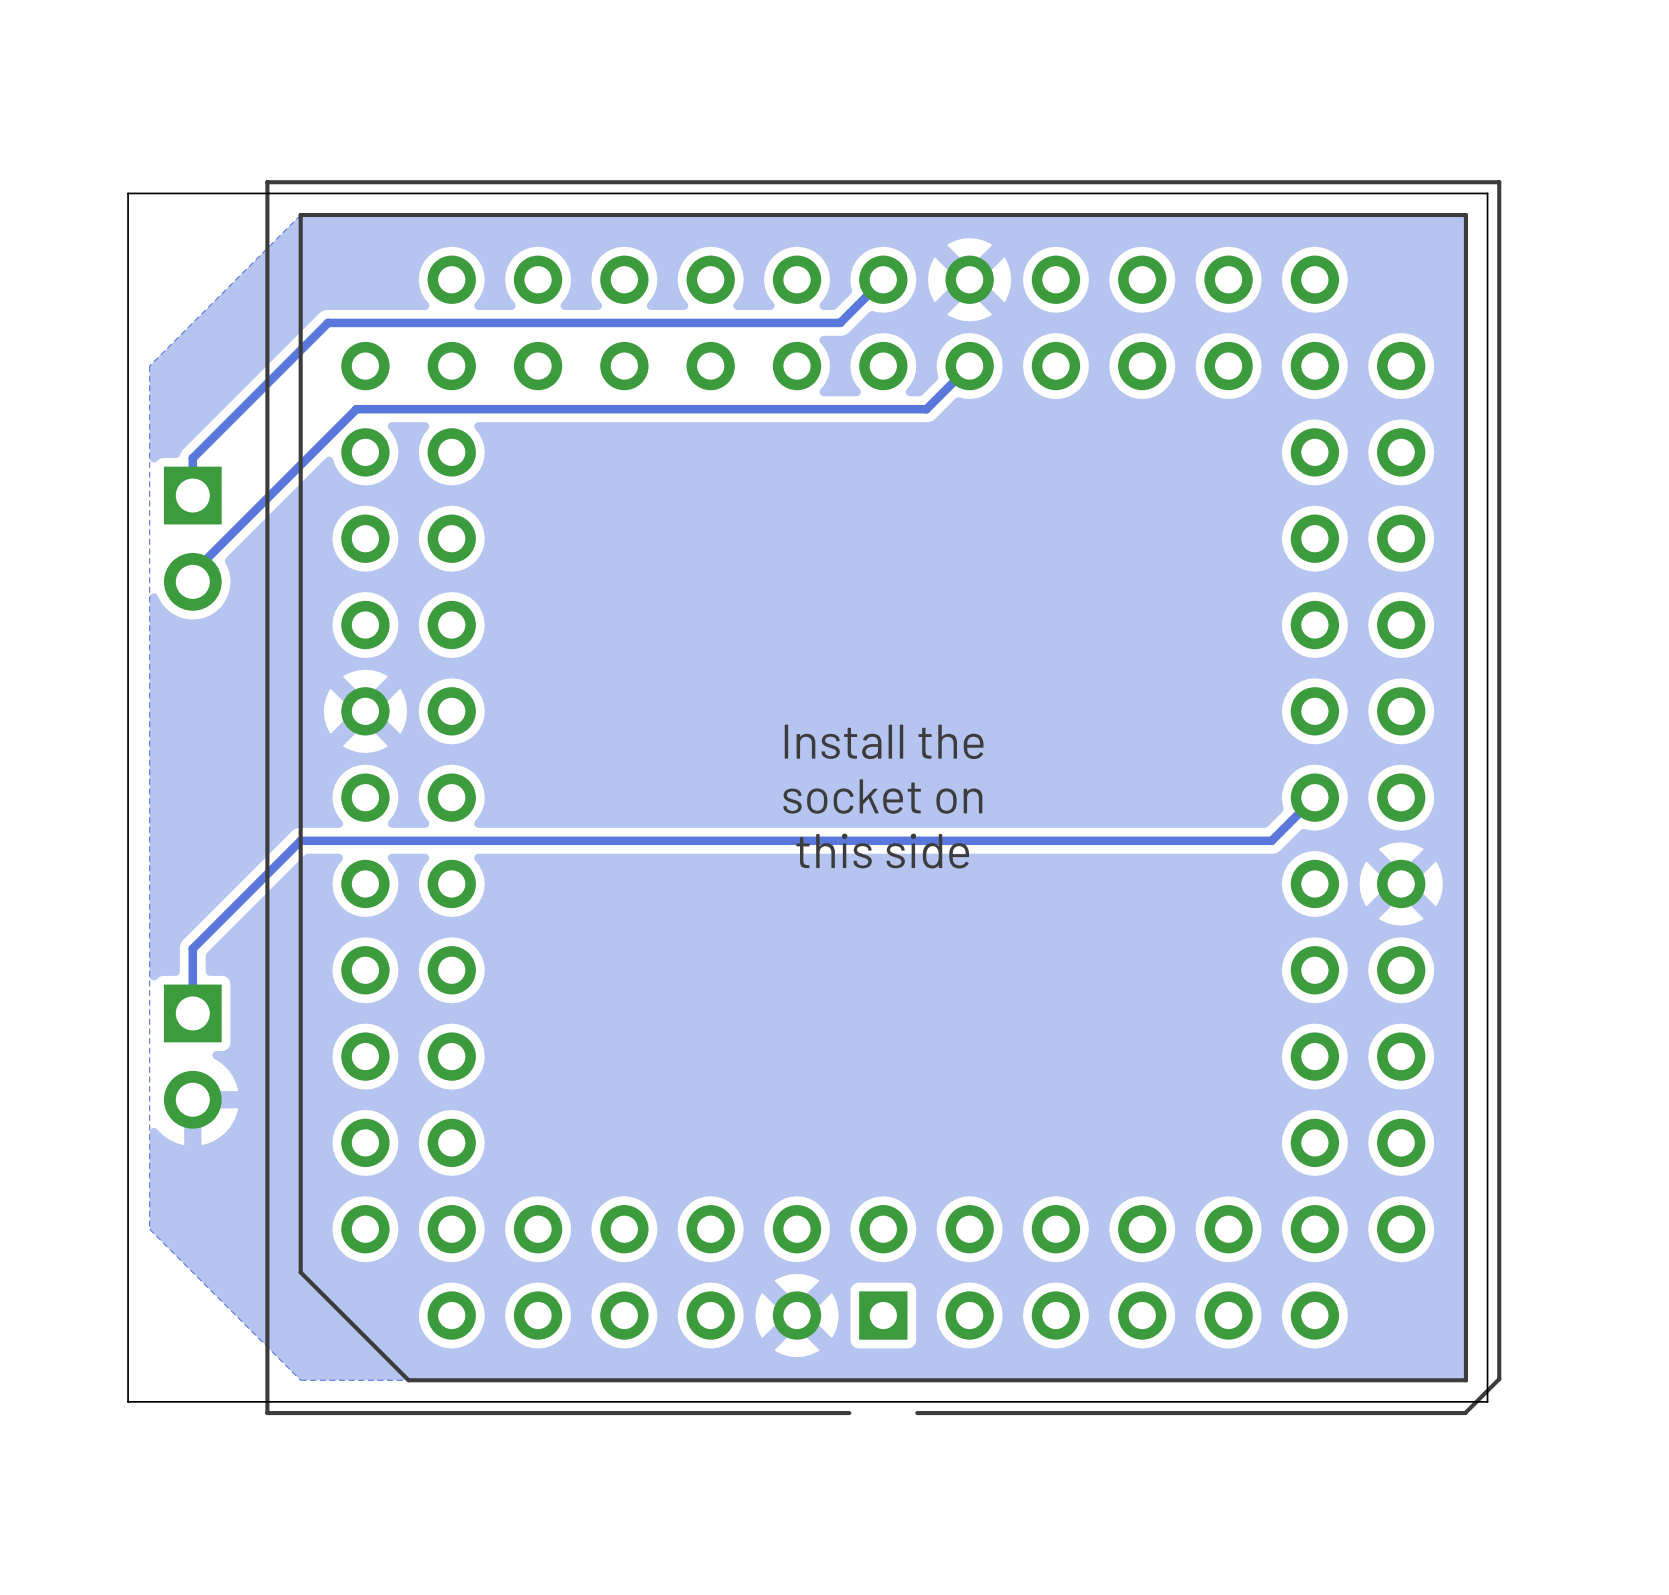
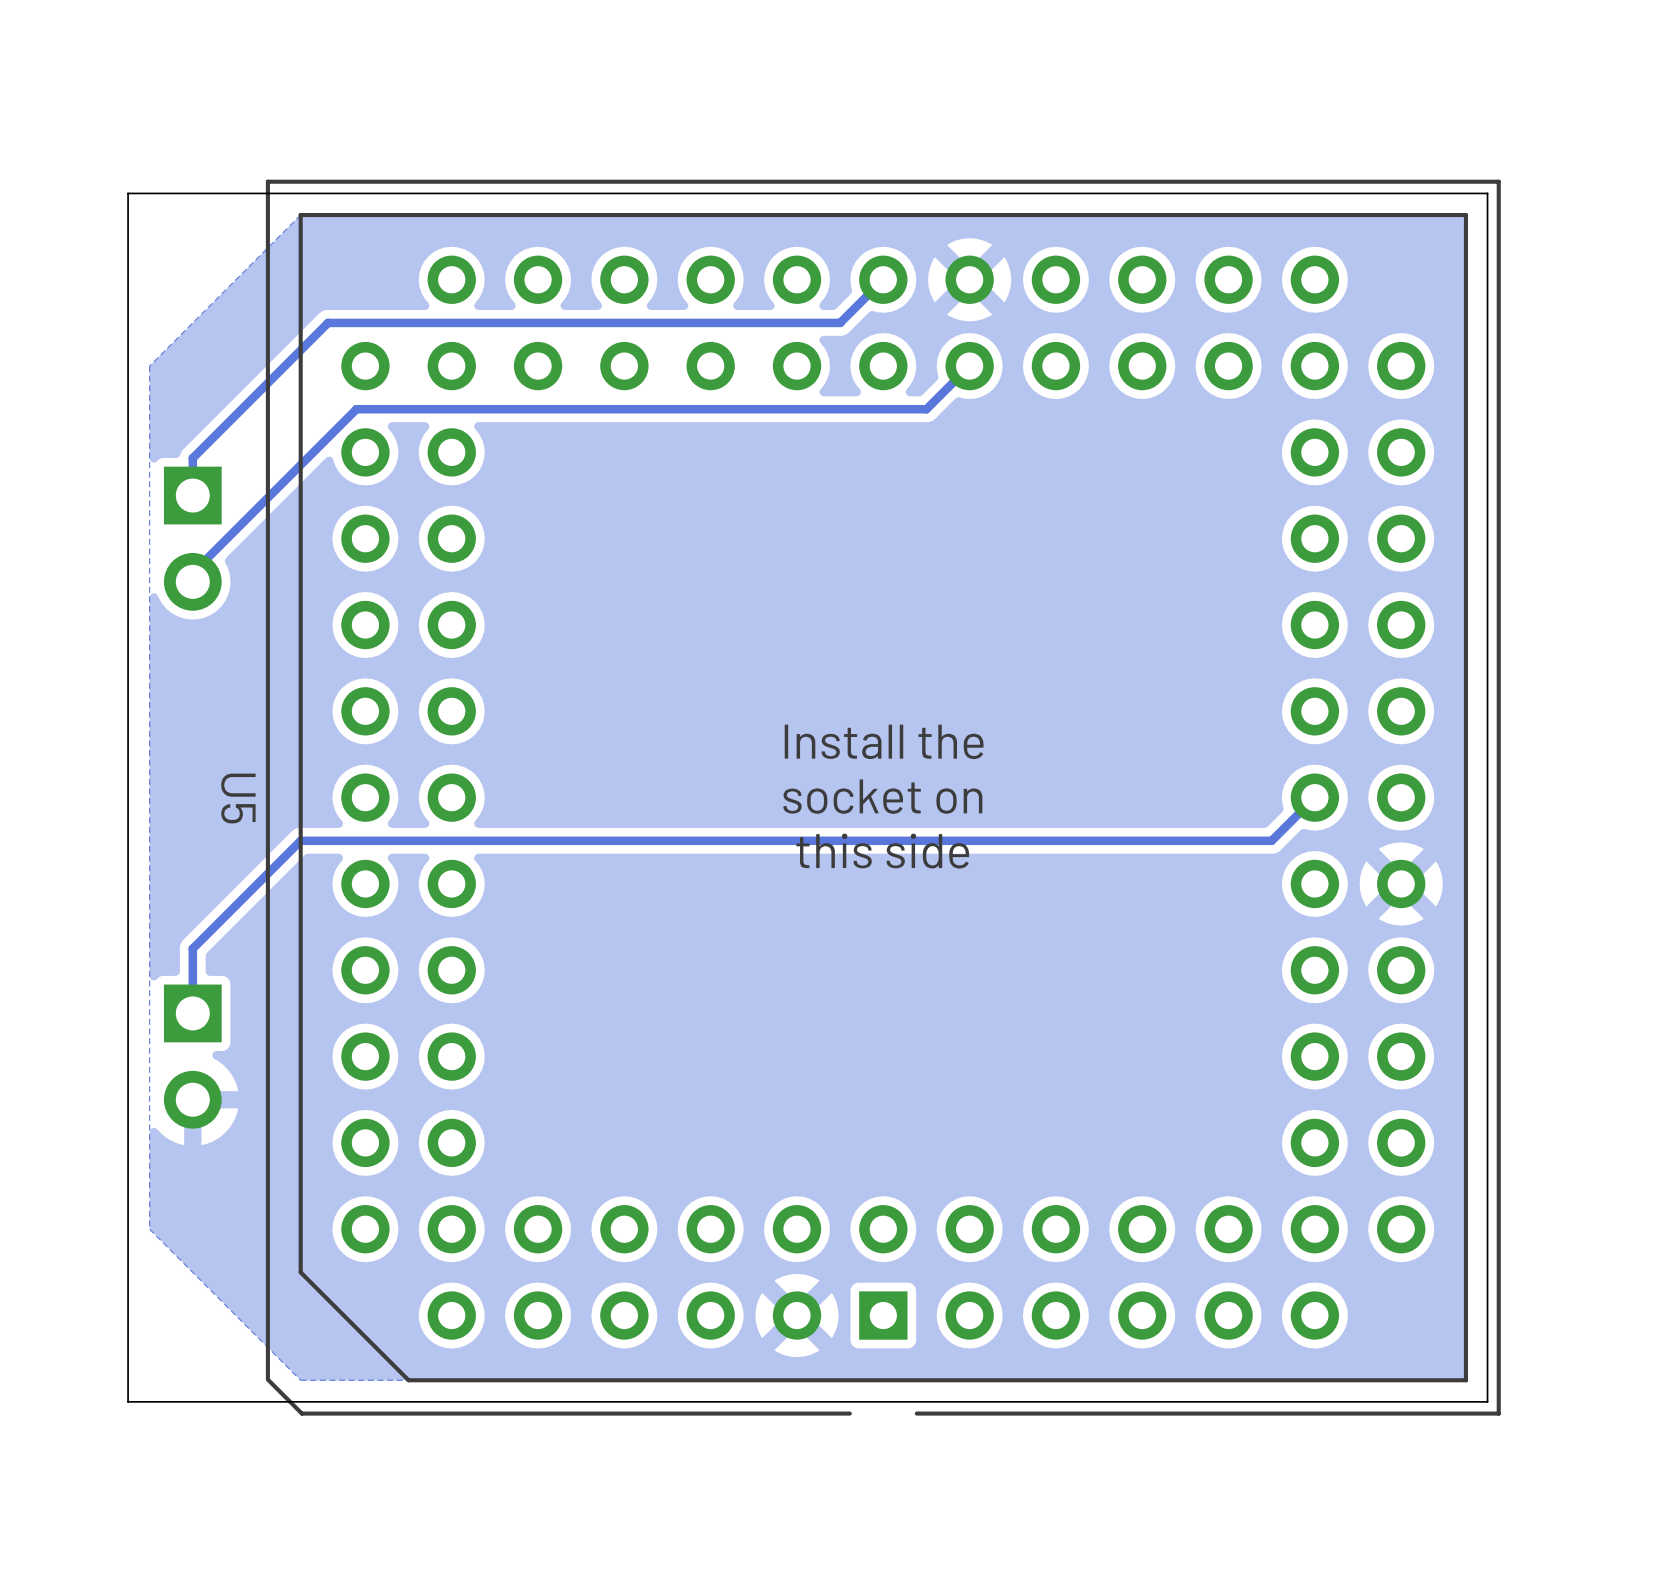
part: (883, 797) -> none
U5: none -> (883, 797)

